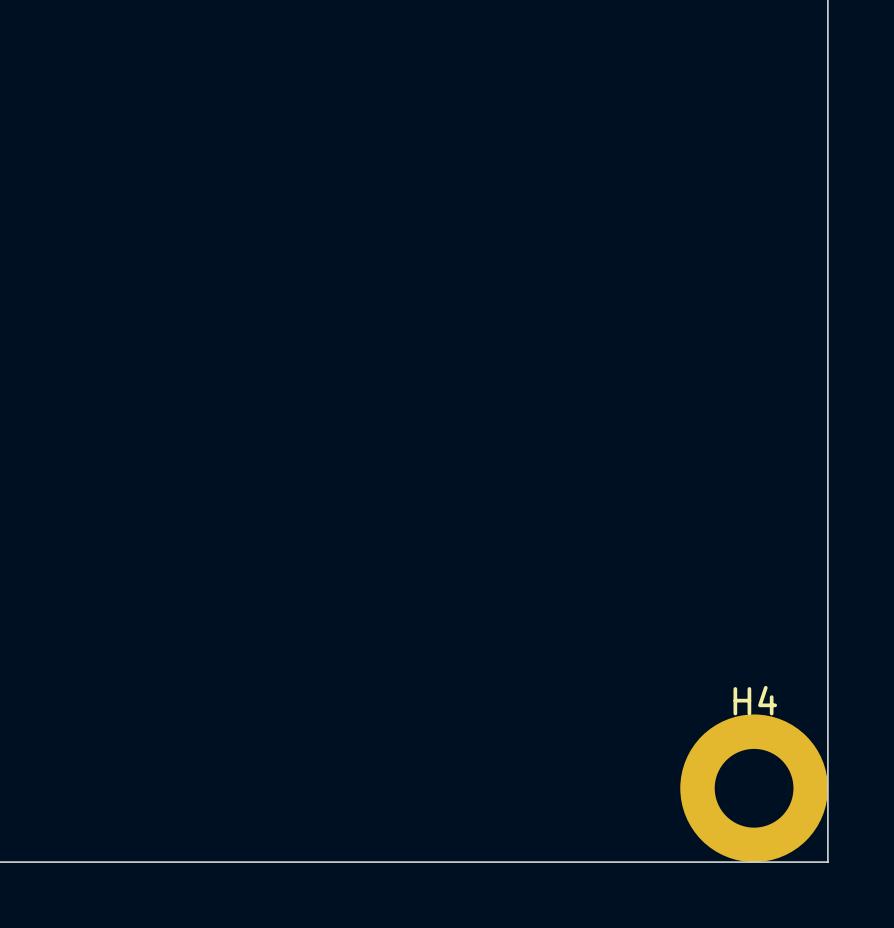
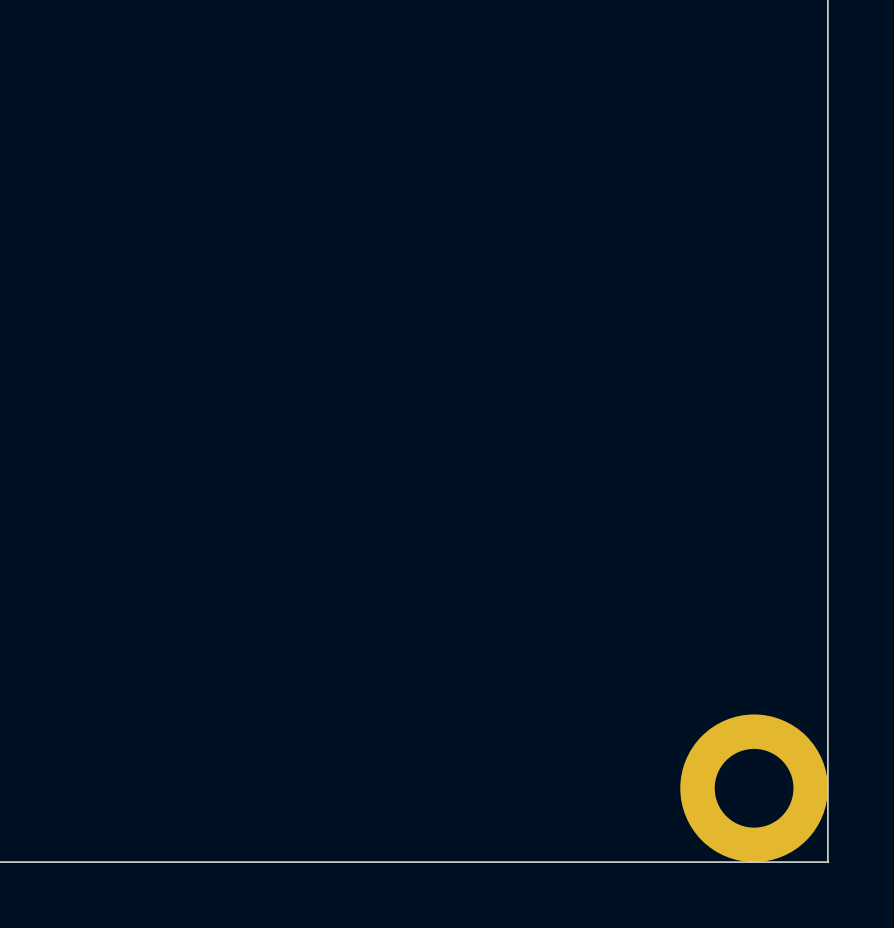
H4 name: H4 (755, 700) -> none

